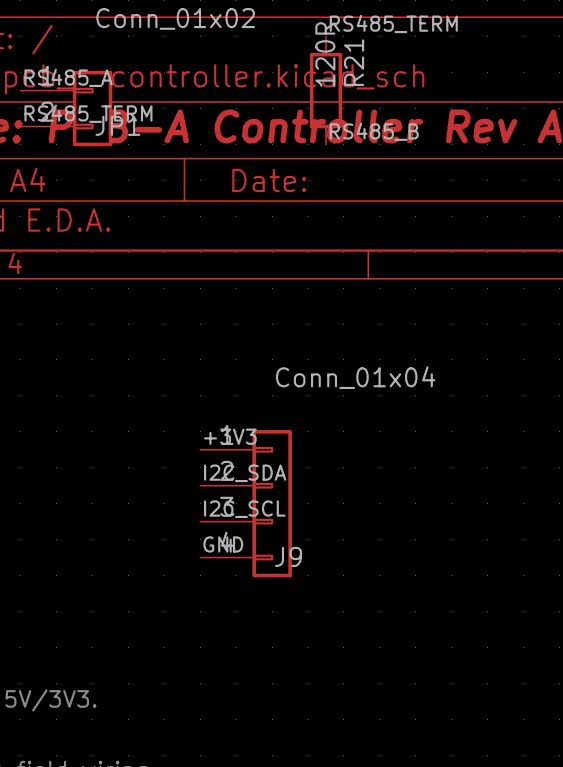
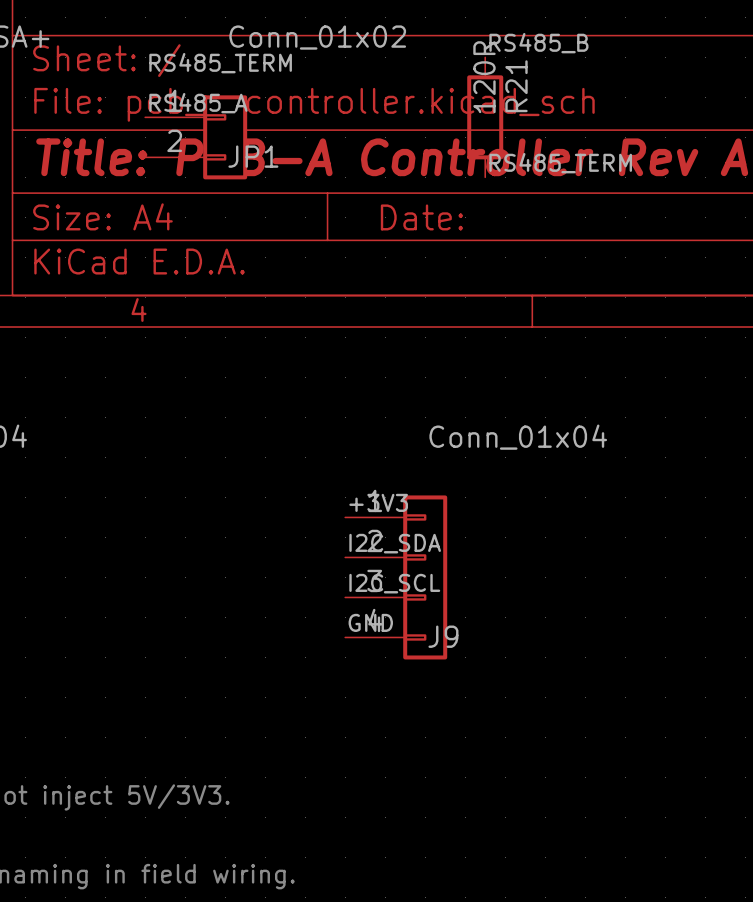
label: RS485_TERM (393, 23) -> RS485_B (538, 43)
label position: RS485_TERM (88, 113) -> RS485_TERM (220, 63)
label: RS485_B (374, 131) -> RS485_TERM (560, 163)

